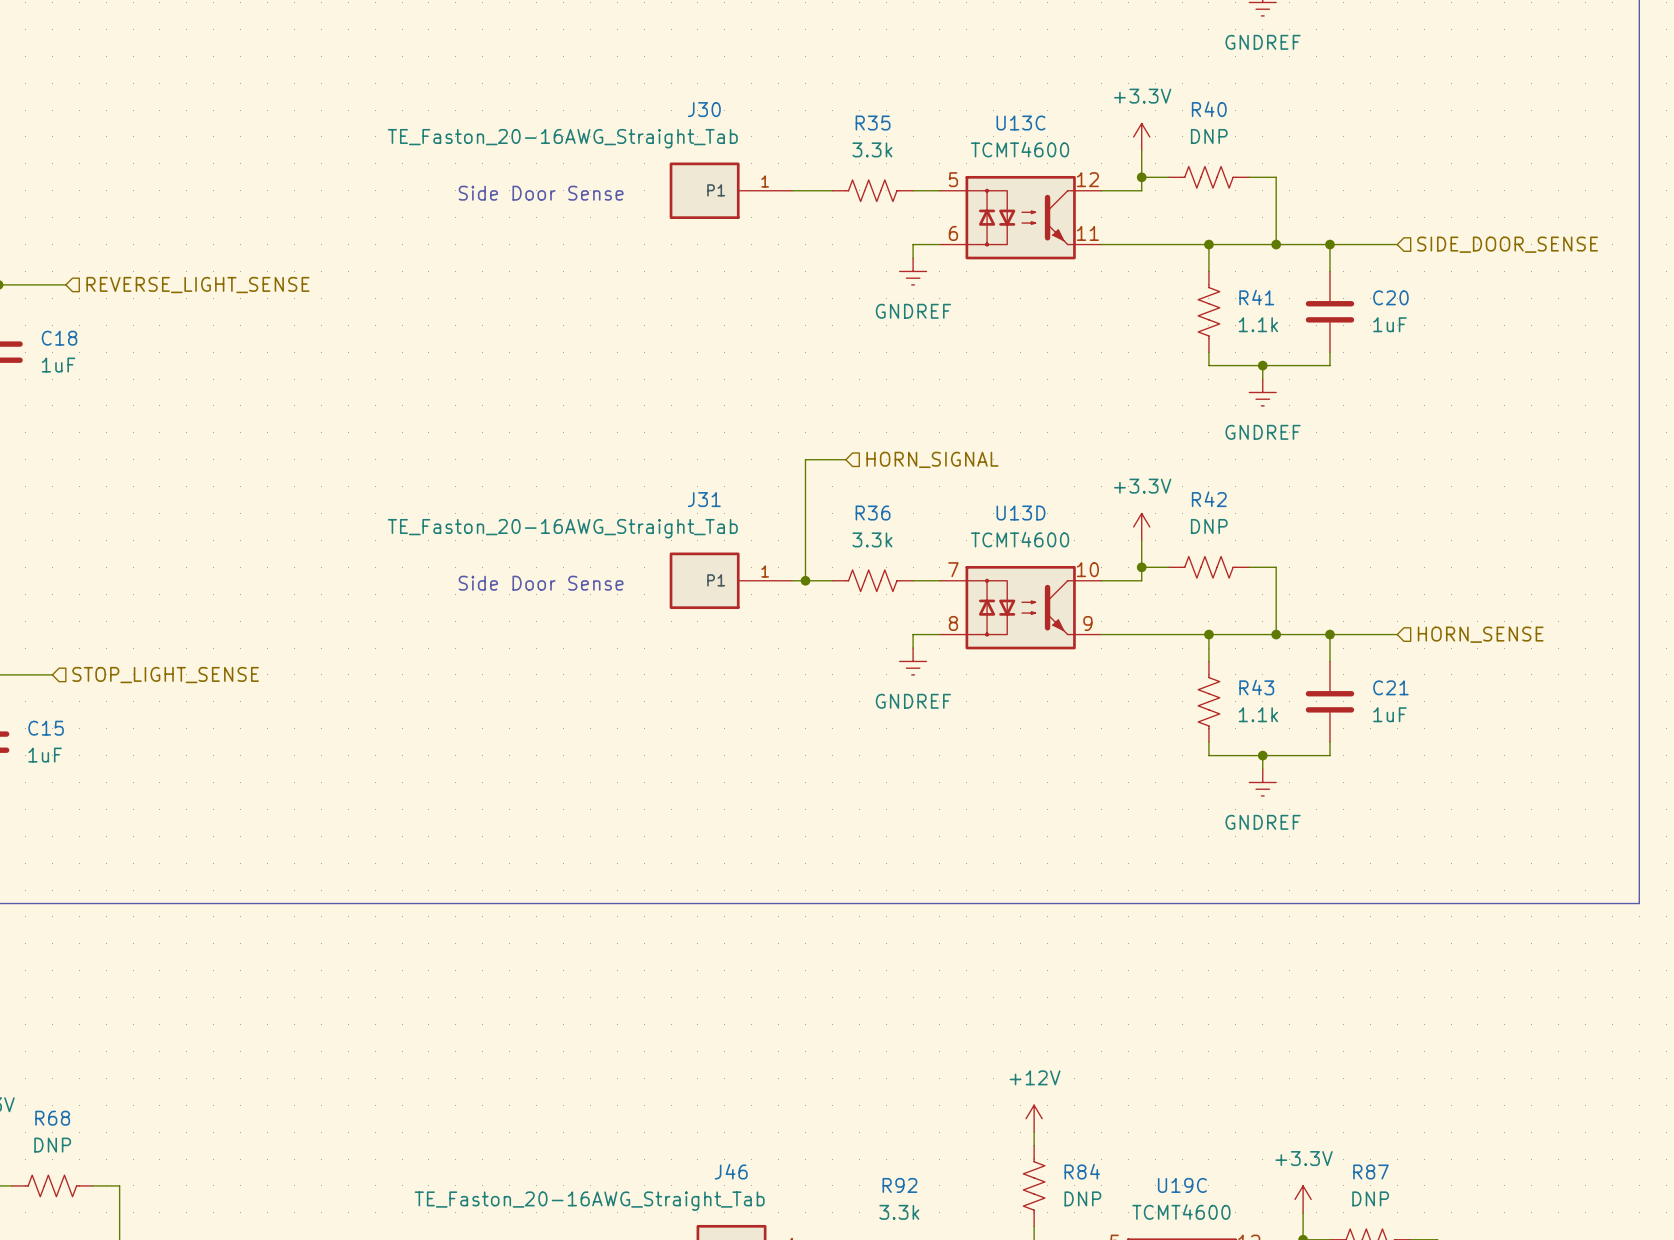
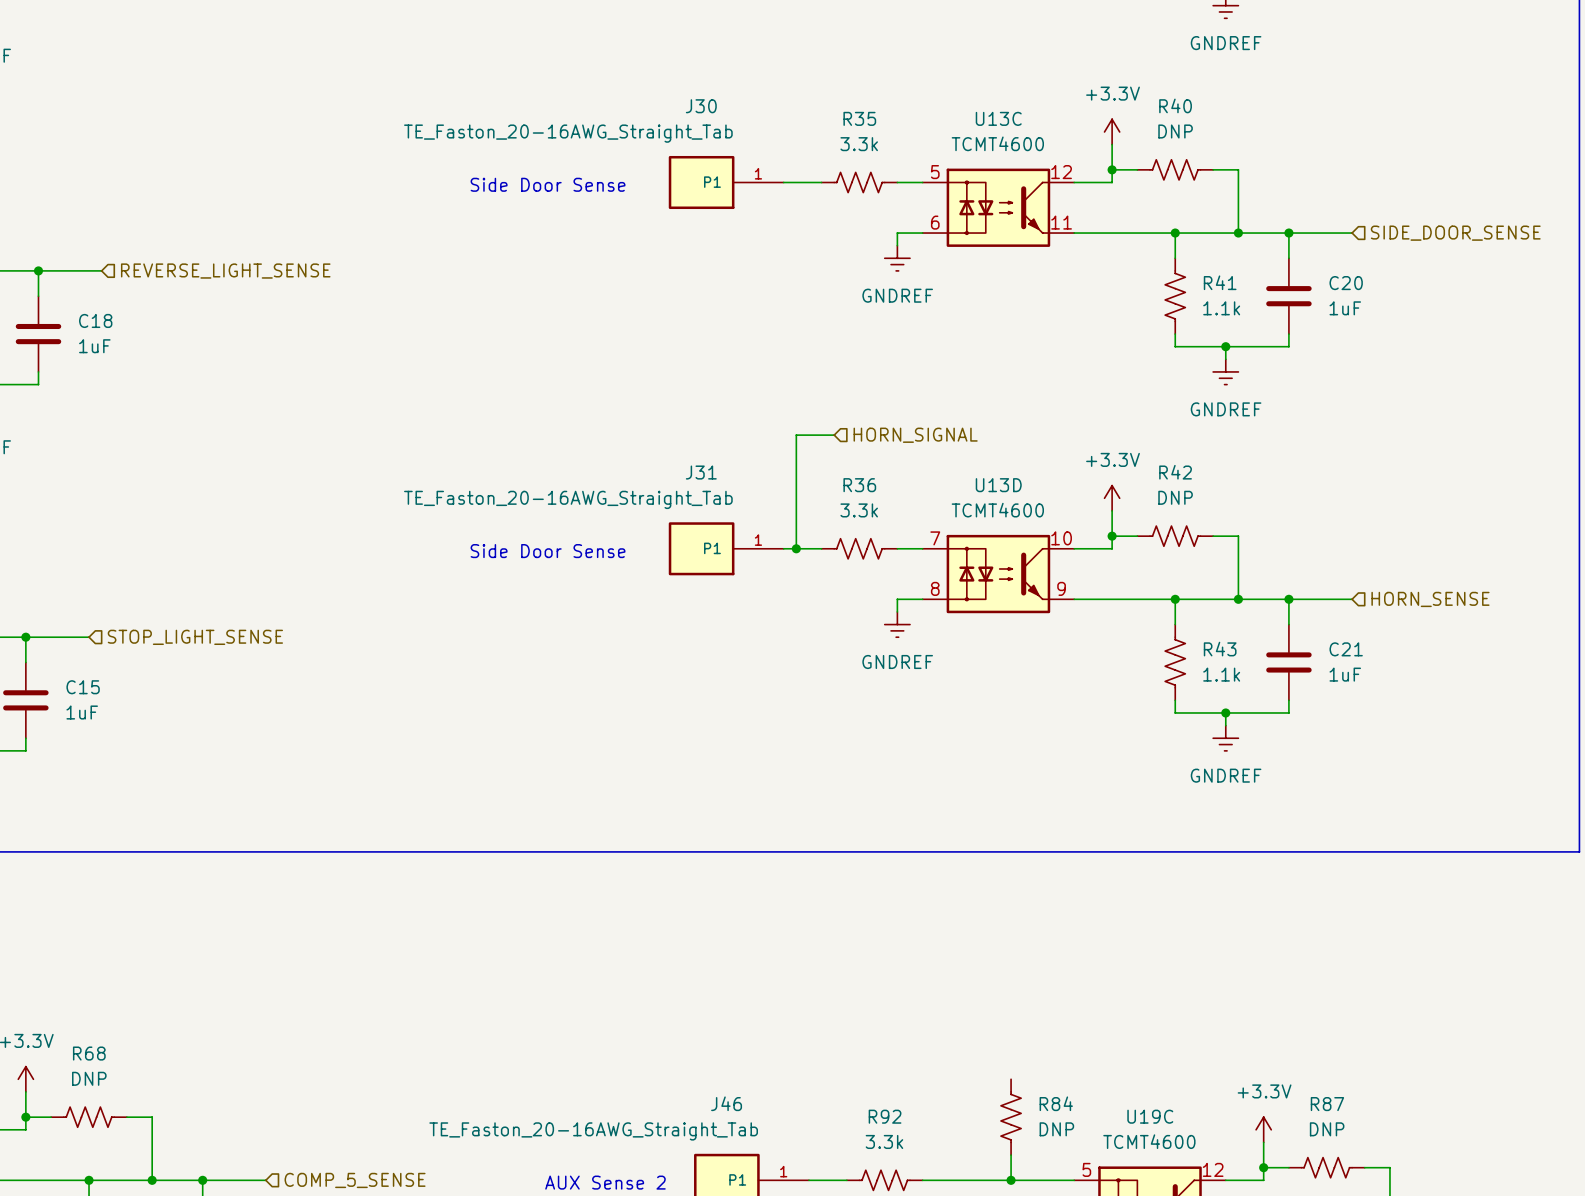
power symbol: +12V (1034, 1118) -> none
wire: (1034, 1132) (1034, 1145) -> none

